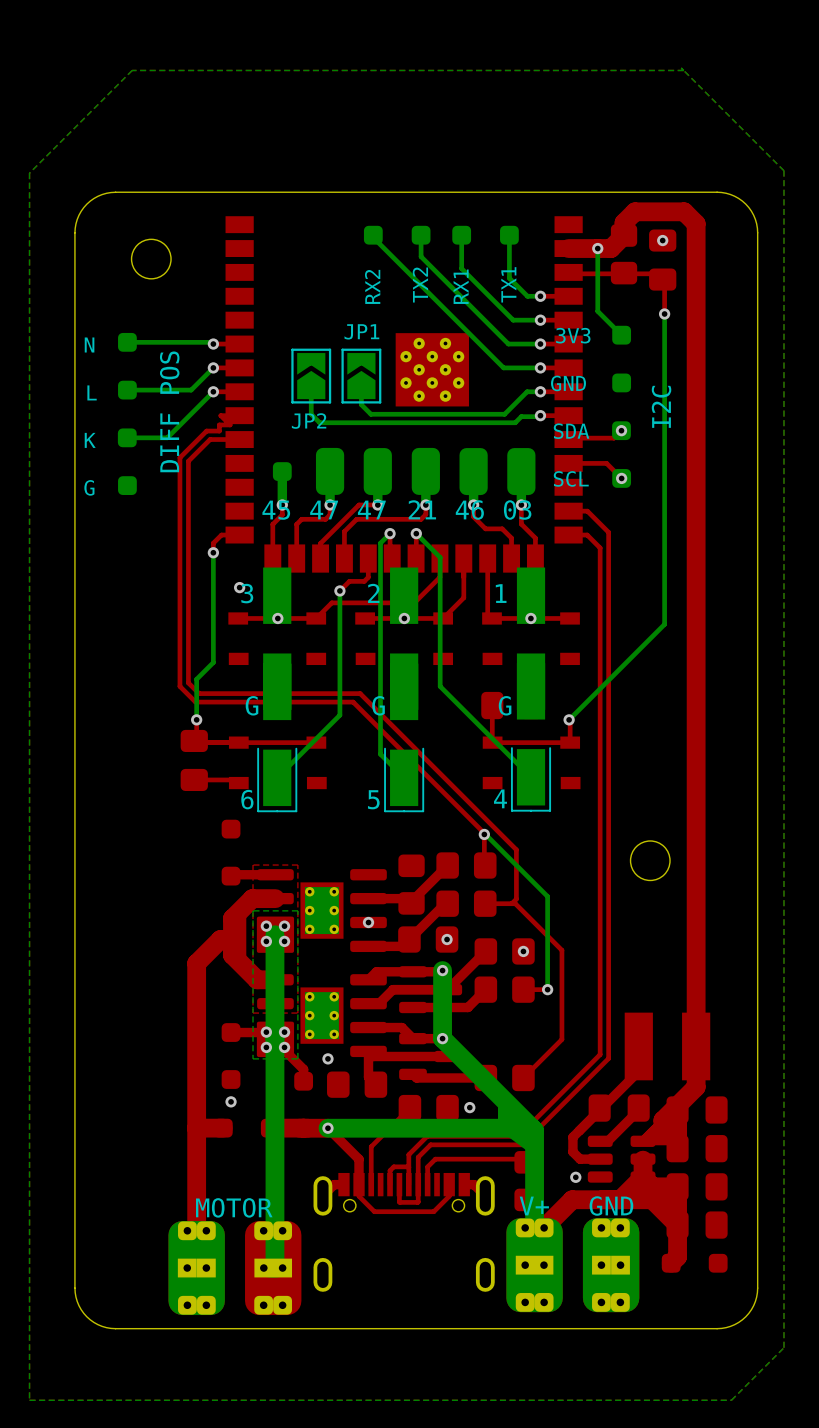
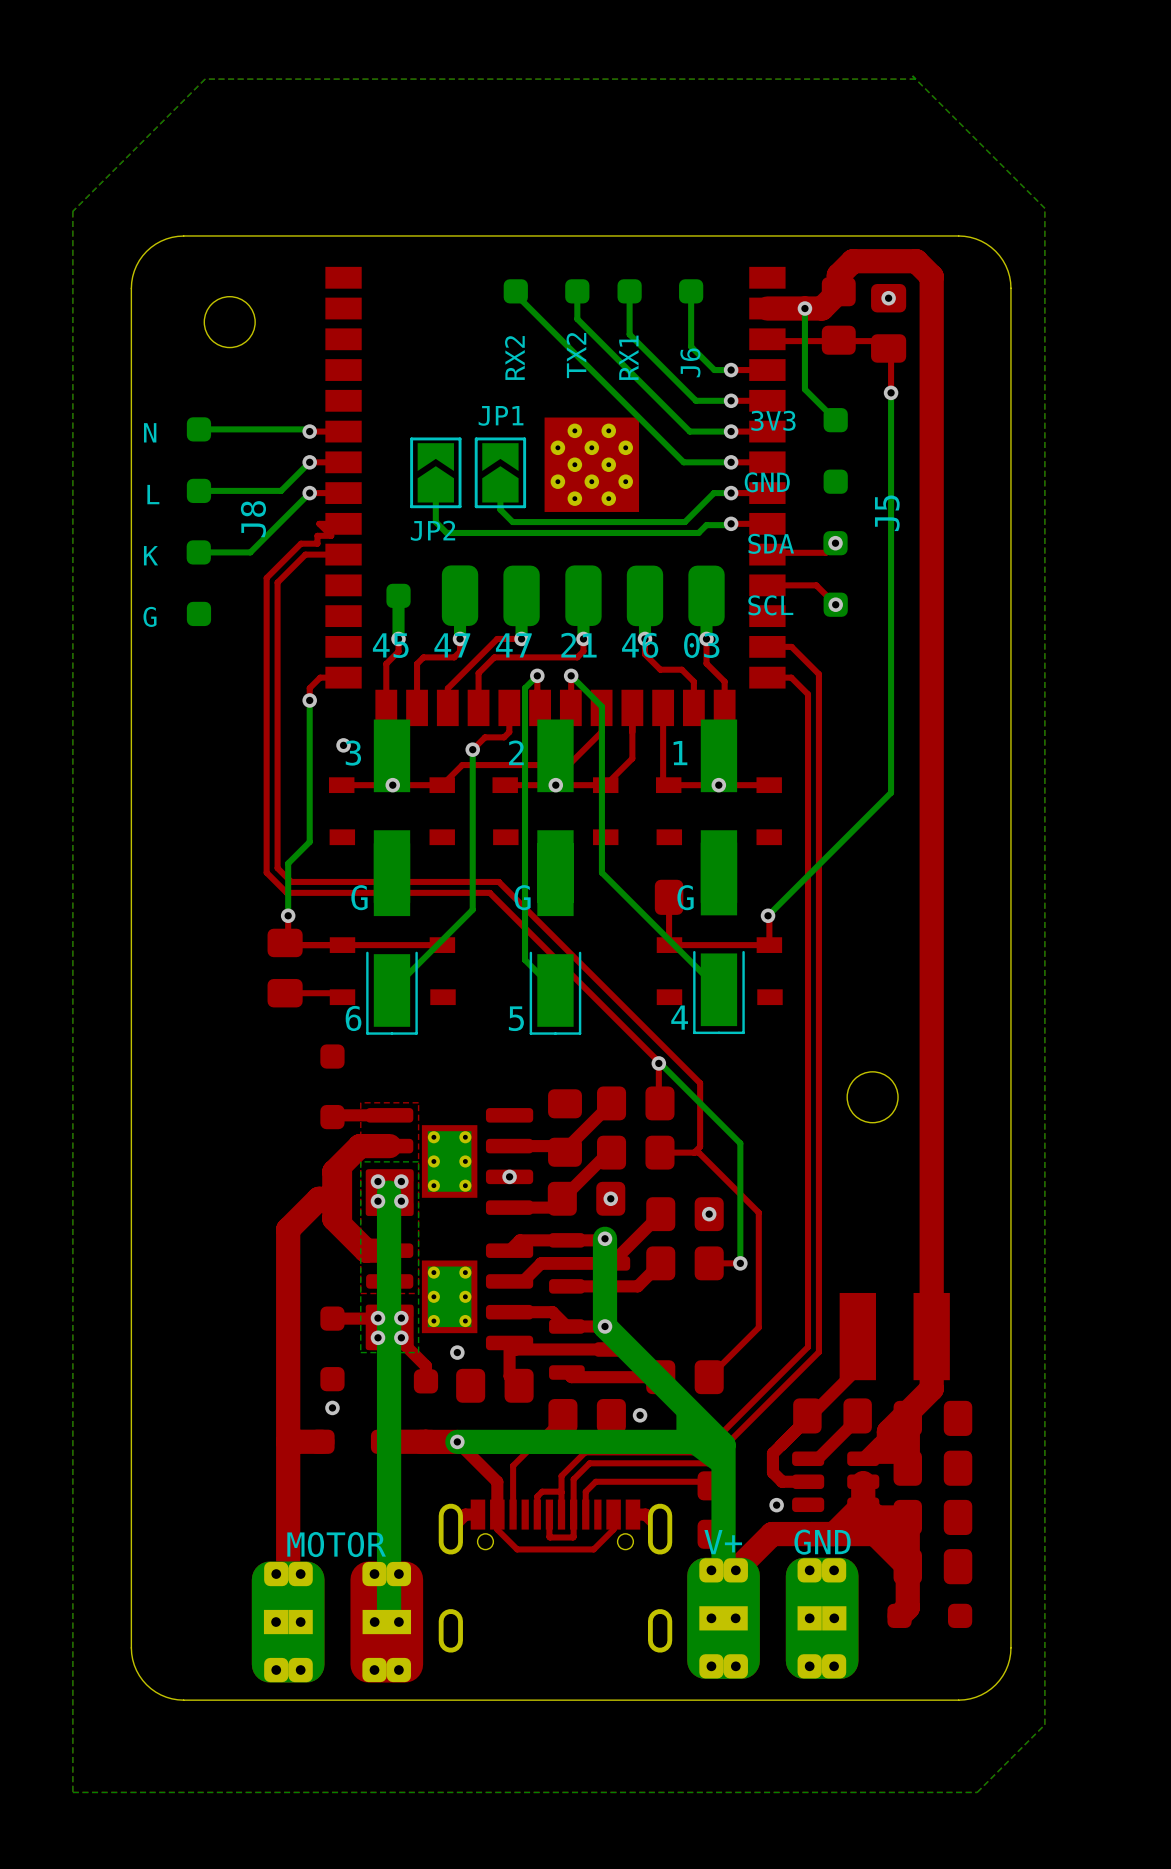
TX1 name: TX1 (508, 284) -> J6 (690, 362)
I2C name: I2C (661, 406) -> J5 (887, 513)
DIFF POS name: DIFF POS (169, 411) -> J8 (253, 519)

